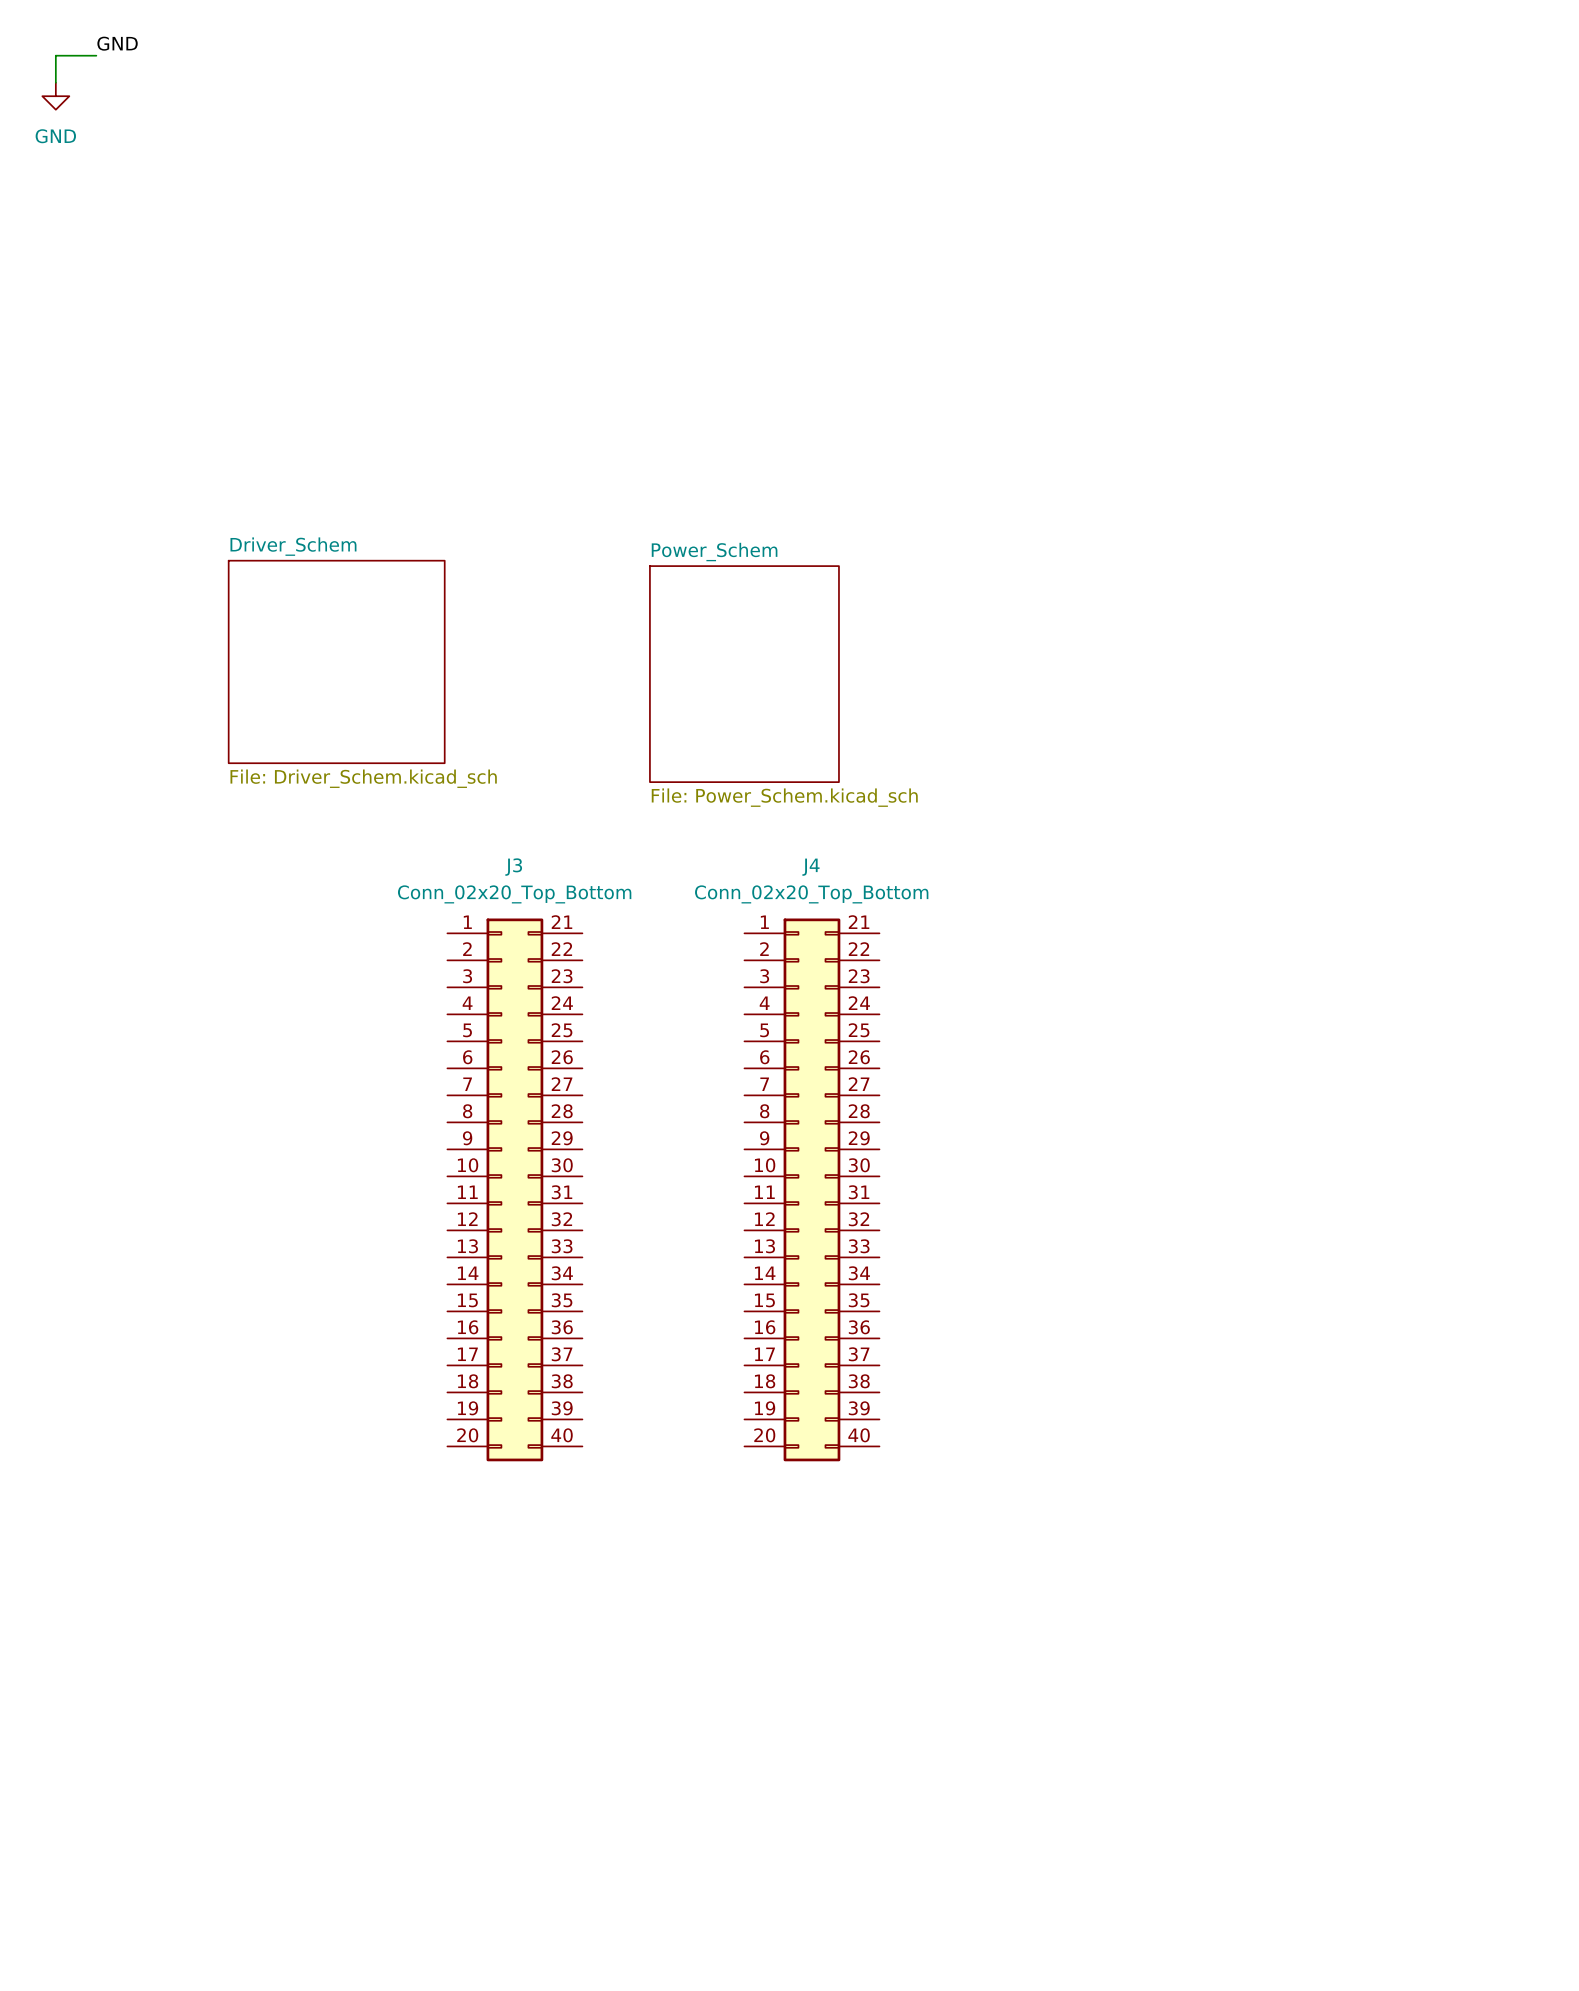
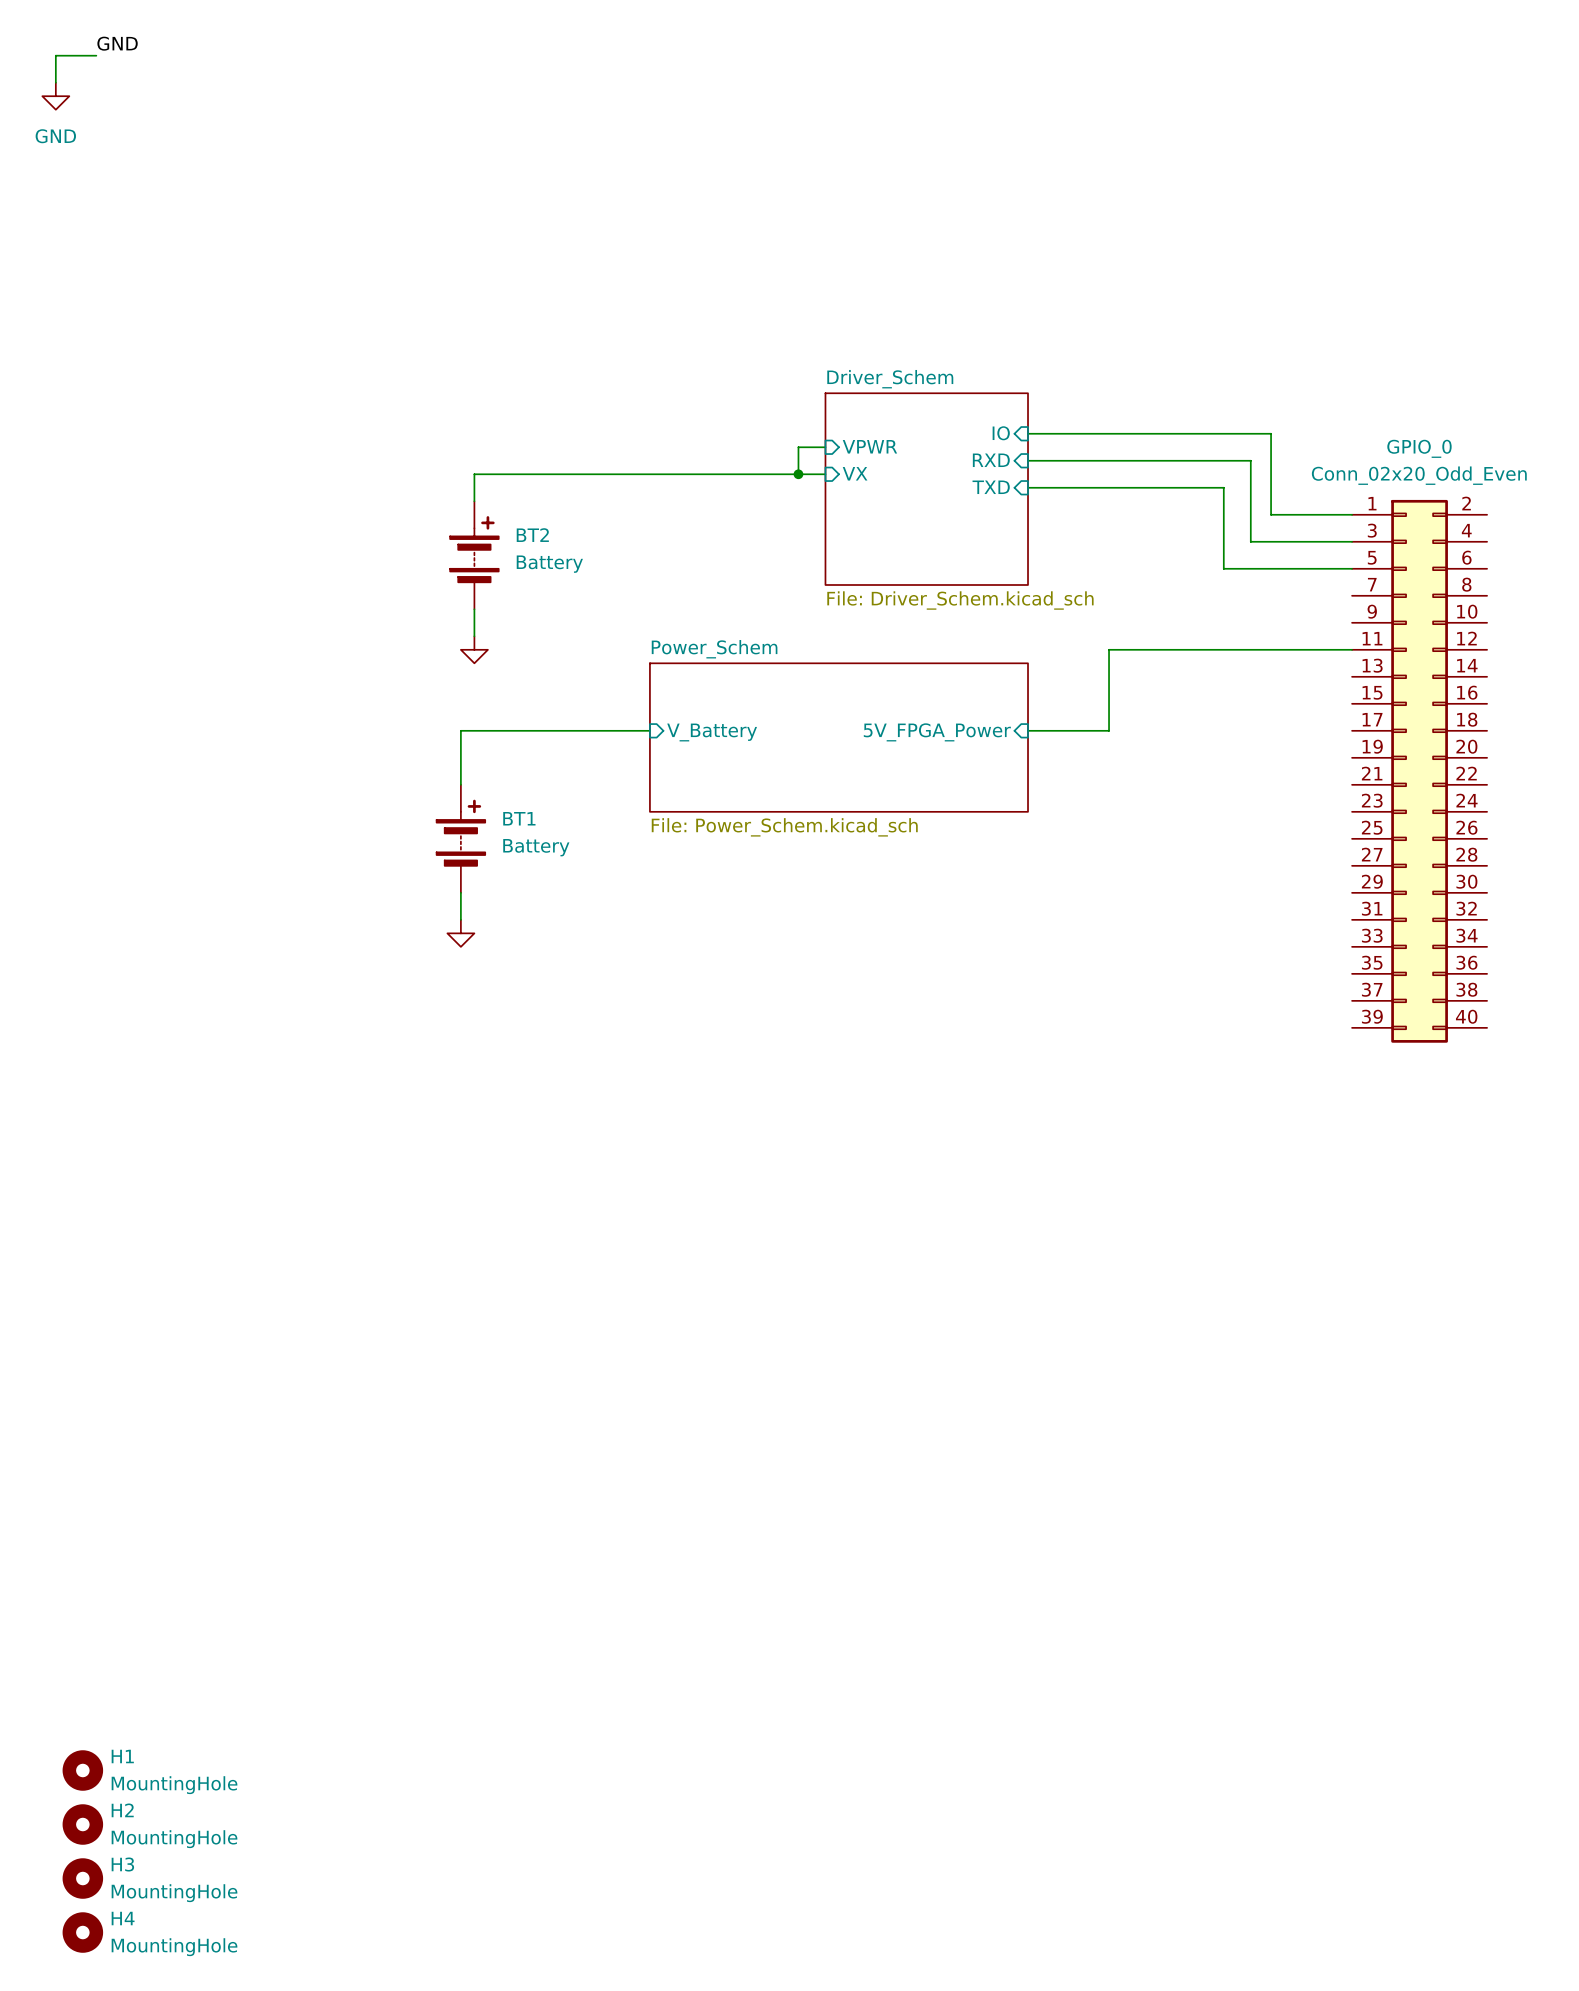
sheet pin: none -> IO (1001, 433)
wire: none -> (1028, 433) (1271, 433) (1271, 514) (1352, 514)
sheet pin: none -> VPWR (869, 446)
wire: none -> (825, 447) (798, 447) (798, 474)
sheet pin: none -> RXD (991, 460)
wire: none -> (1028, 460) (1250, 460) (1250, 541) (1352, 541)
sheet pin: none -> VX (855, 473)
junction: none -> (798, 474)
wire: none -> (825, 474) (474, 474) (474, 501)
sheet pin: none -> TXD (991, 487)
wire: none -> (1028, 487) (1223, 487) (1223, 568) (1352, 568)
sheet Driver_Schem: none -> File: Driver_Schem.kicad_sch (926, 489)
BT2: none -> Battery (474, 555)
wire: none -> (474, 609) (474, 636)
power symbol: none -> (474, 649)
wire: none -> (1352, 649) (1109, 649) (1109, 730) (1028, 730)
sheet Driver_Schem: File: Driver_Schem.kicad_sch (336, 661) -> none
sheet Power_Schem: File: Power_Schem.kicad_sch (744, 674) -> none
wire: none -> (649, 730) (460, 730) (460, 784)
sheet pin: none -> V_Battery (712, 732)
sheet pin: none -> 5V_FPGA_Power (937, 732)
sheet Power_Schem: none -> File: Power_Schem.kicad_sch (838, 737)
GPIO_0: none -> Conn_02x20_Odd_Even (1419, 771)
BT1: none -> Battery (460, 838)
wire: none -> (460, 892) (460, 919)
power symbol: none -> (460, 933)
J3: Conn_02x20_Top_Bottom (514, 1189) -> none
J4: Conn_02x20_Top_Bottom (811, 1189) -> none
H1: none -> MountingHole (82, 1770)
H2: none -> MountingHole (82, 1824)
H3: none -> MountingHole (82, 1878)
H4: none -> MountingHole (82, 1932)

